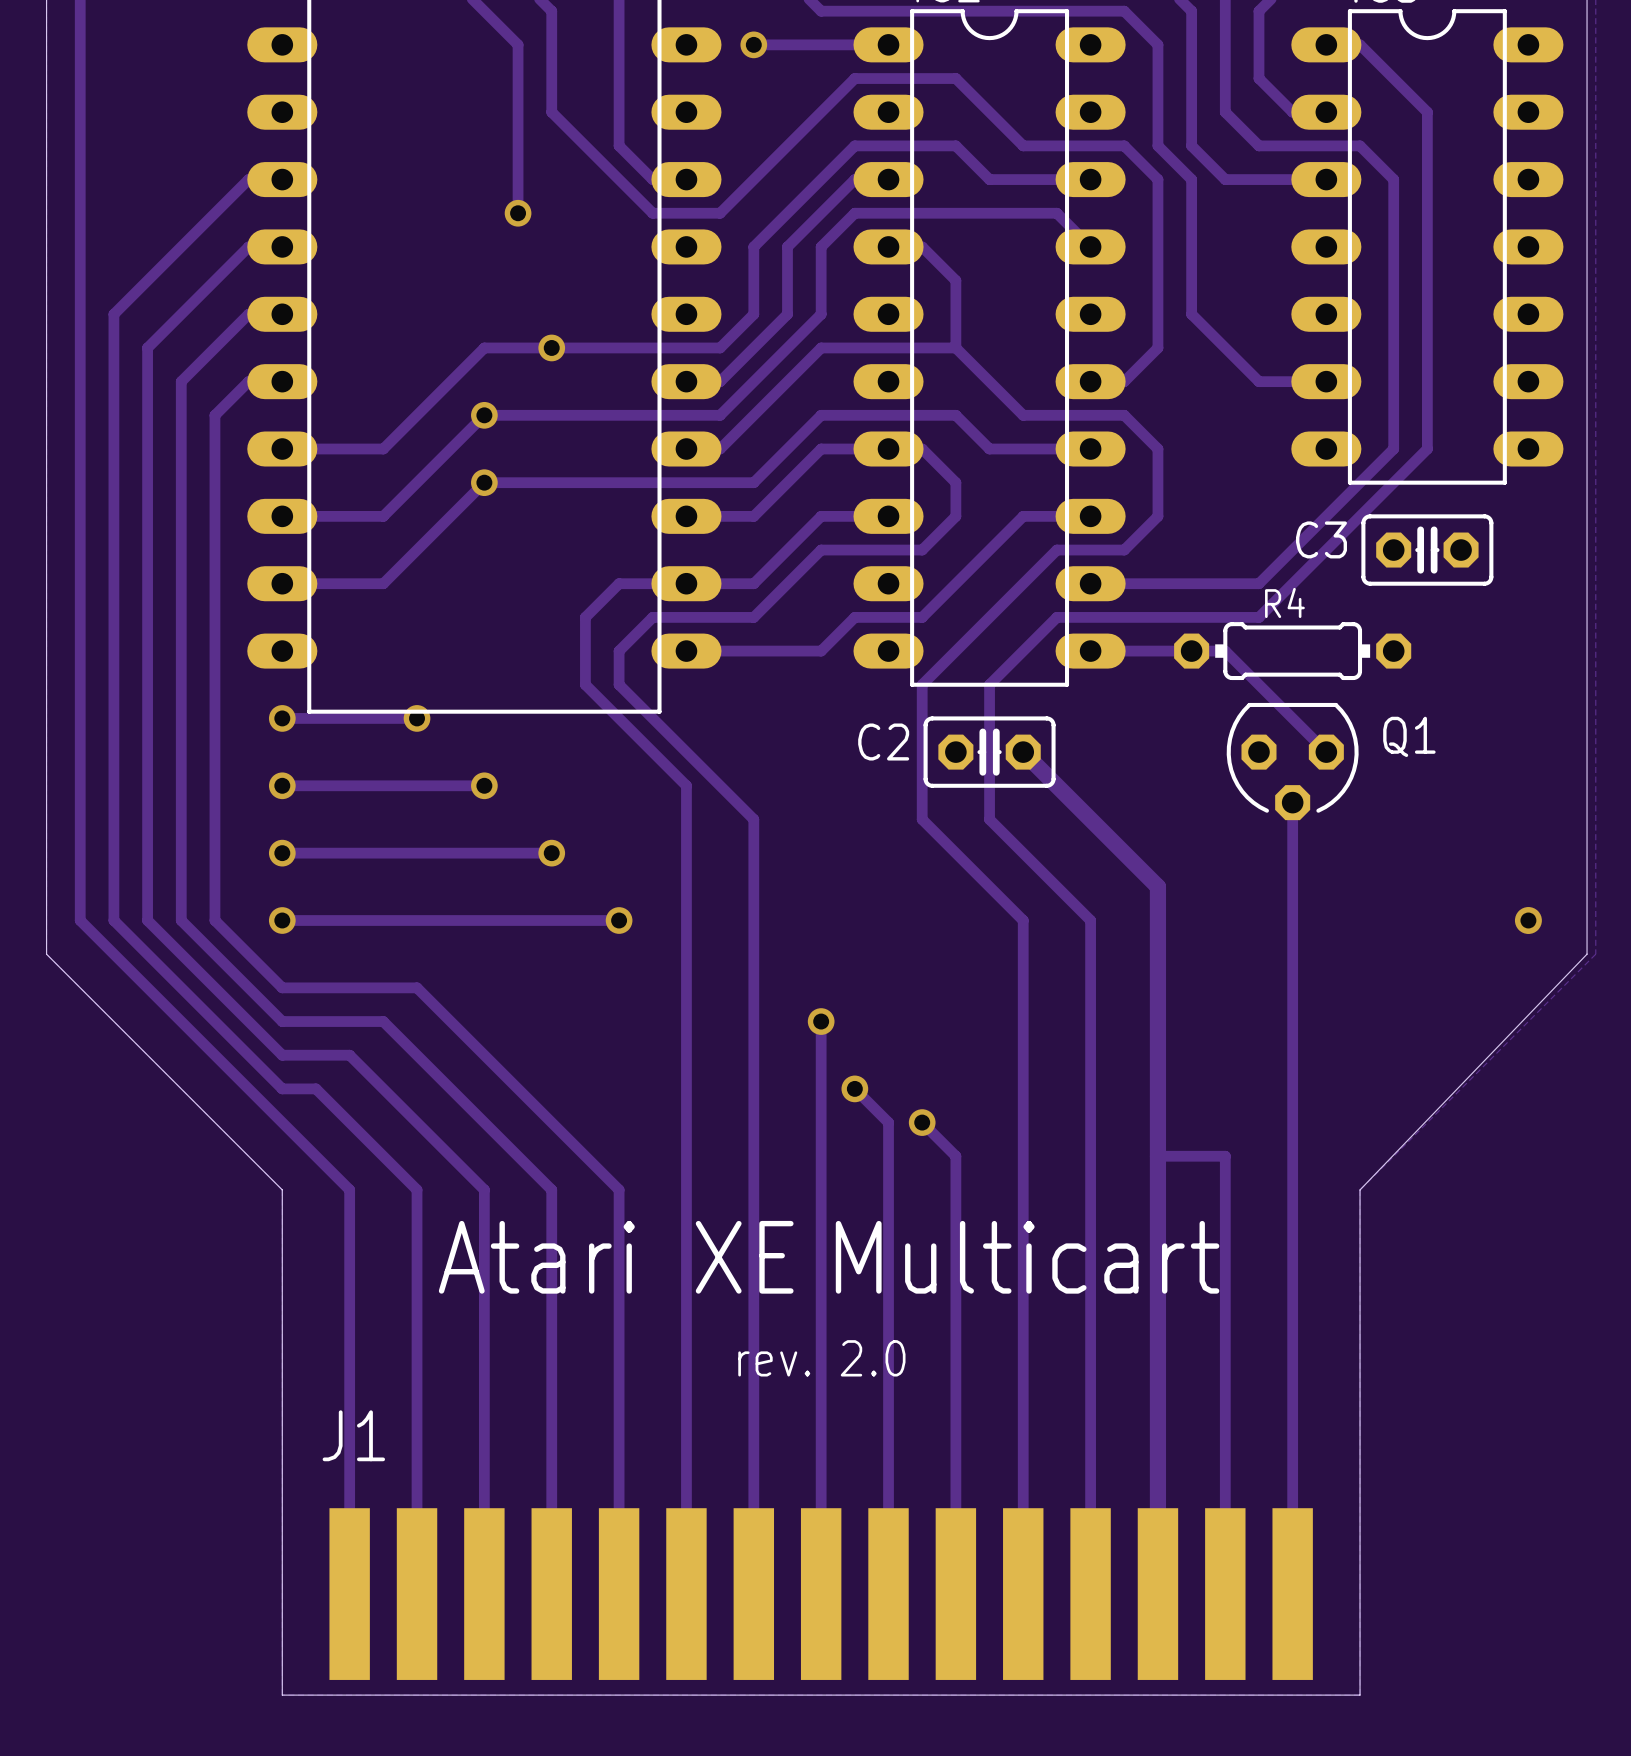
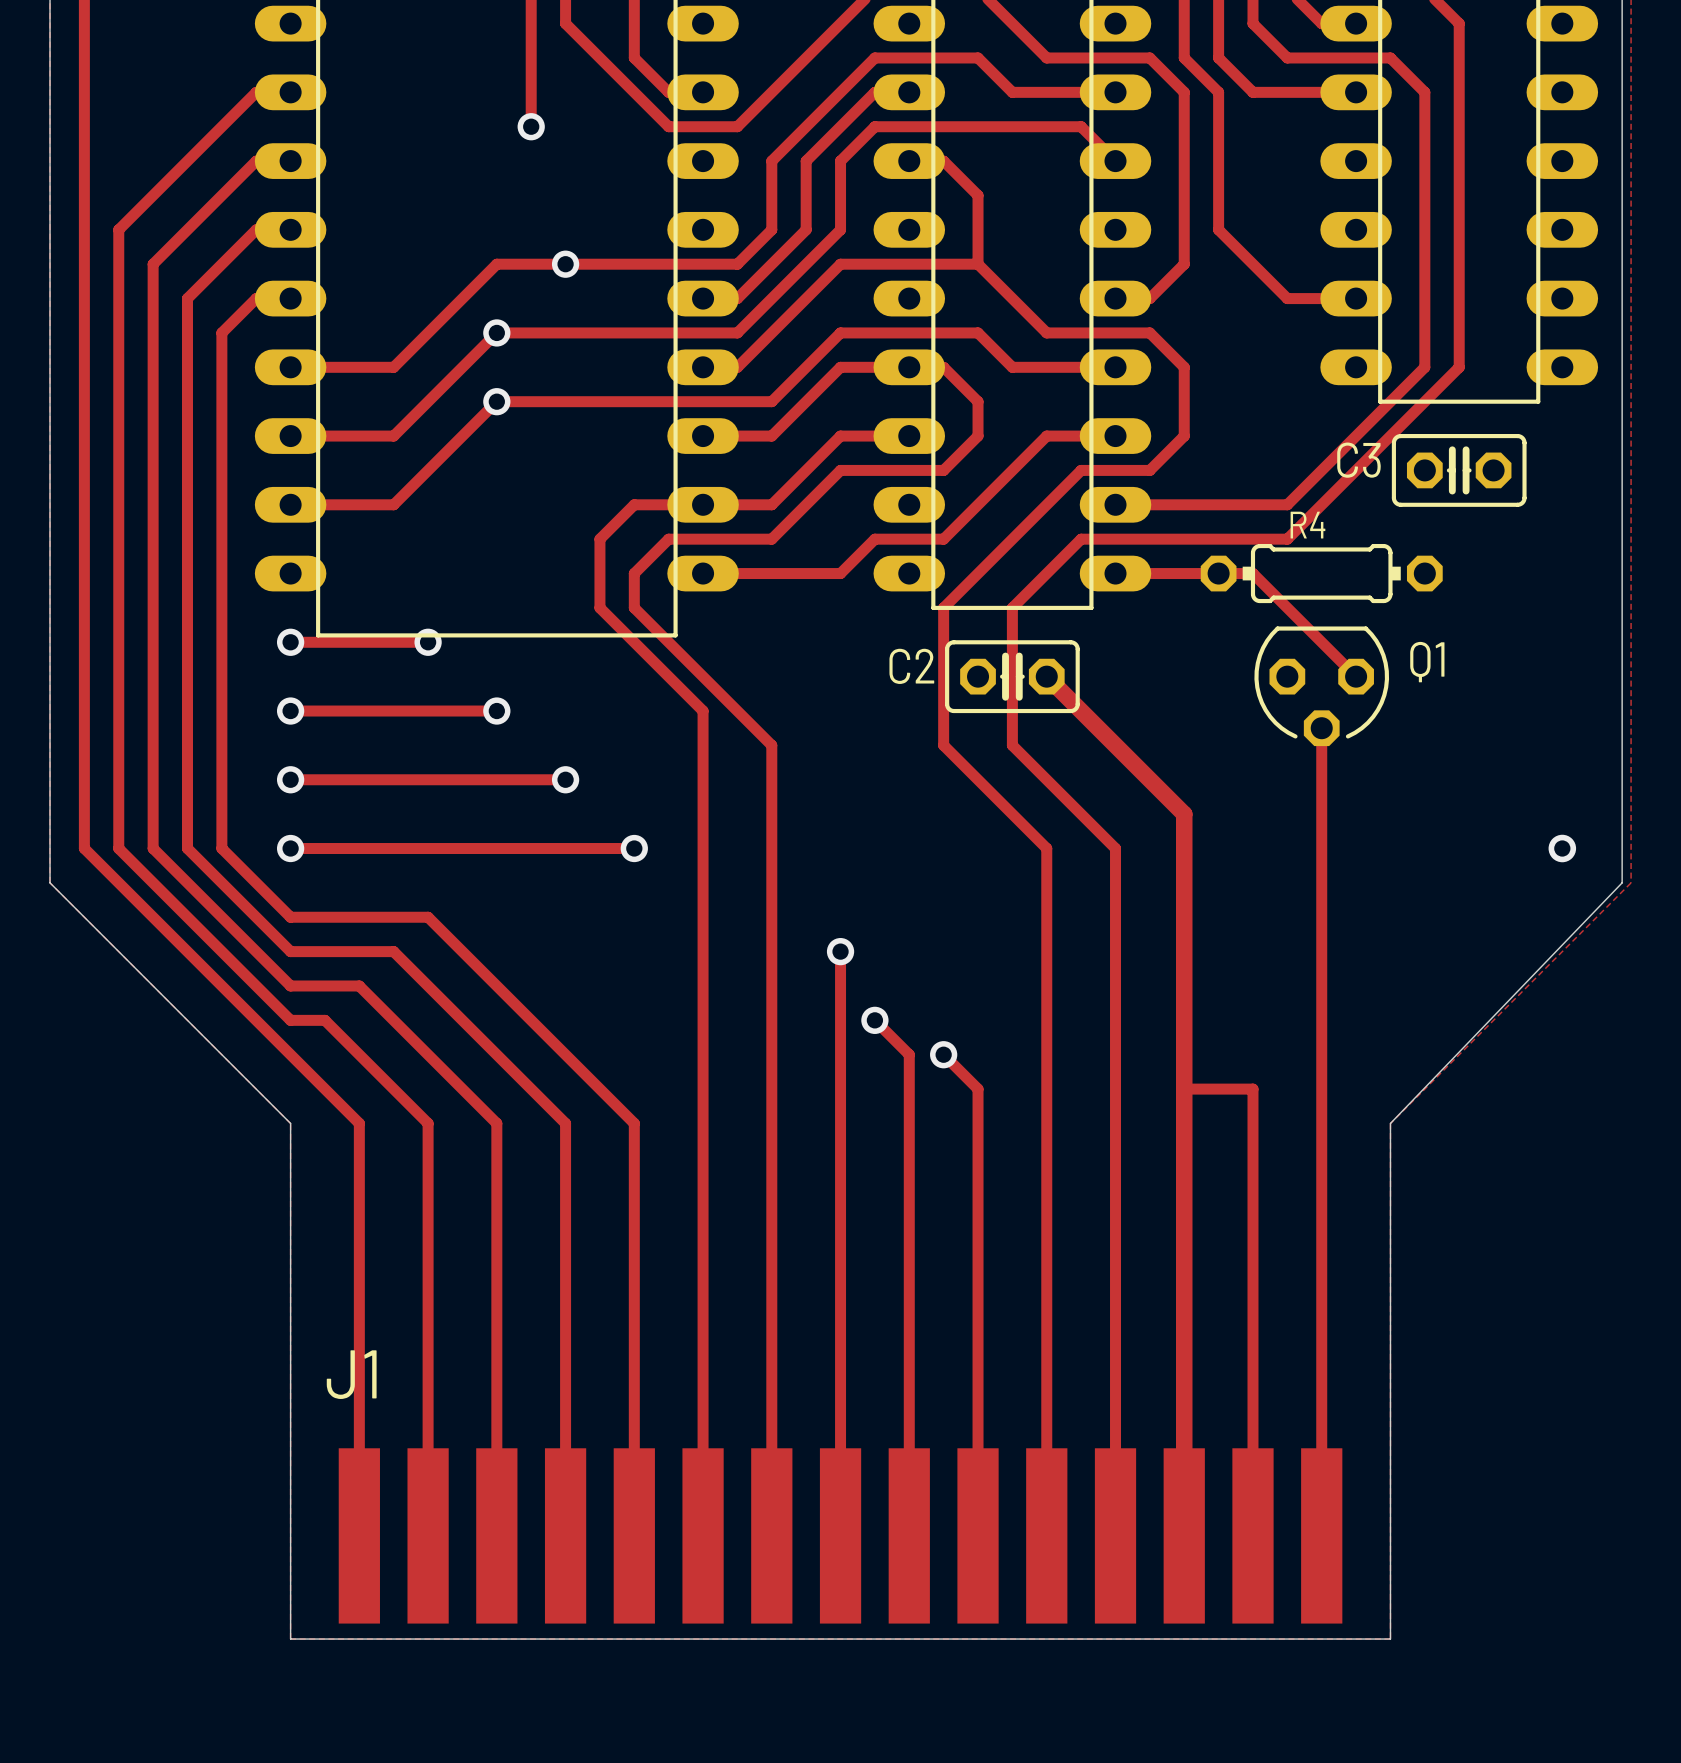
text: Atari XE (616, 1257) -> none
text: Multicart (1027, 1257) -> none
text: rev. 2.0 (821, 1358) -> none

